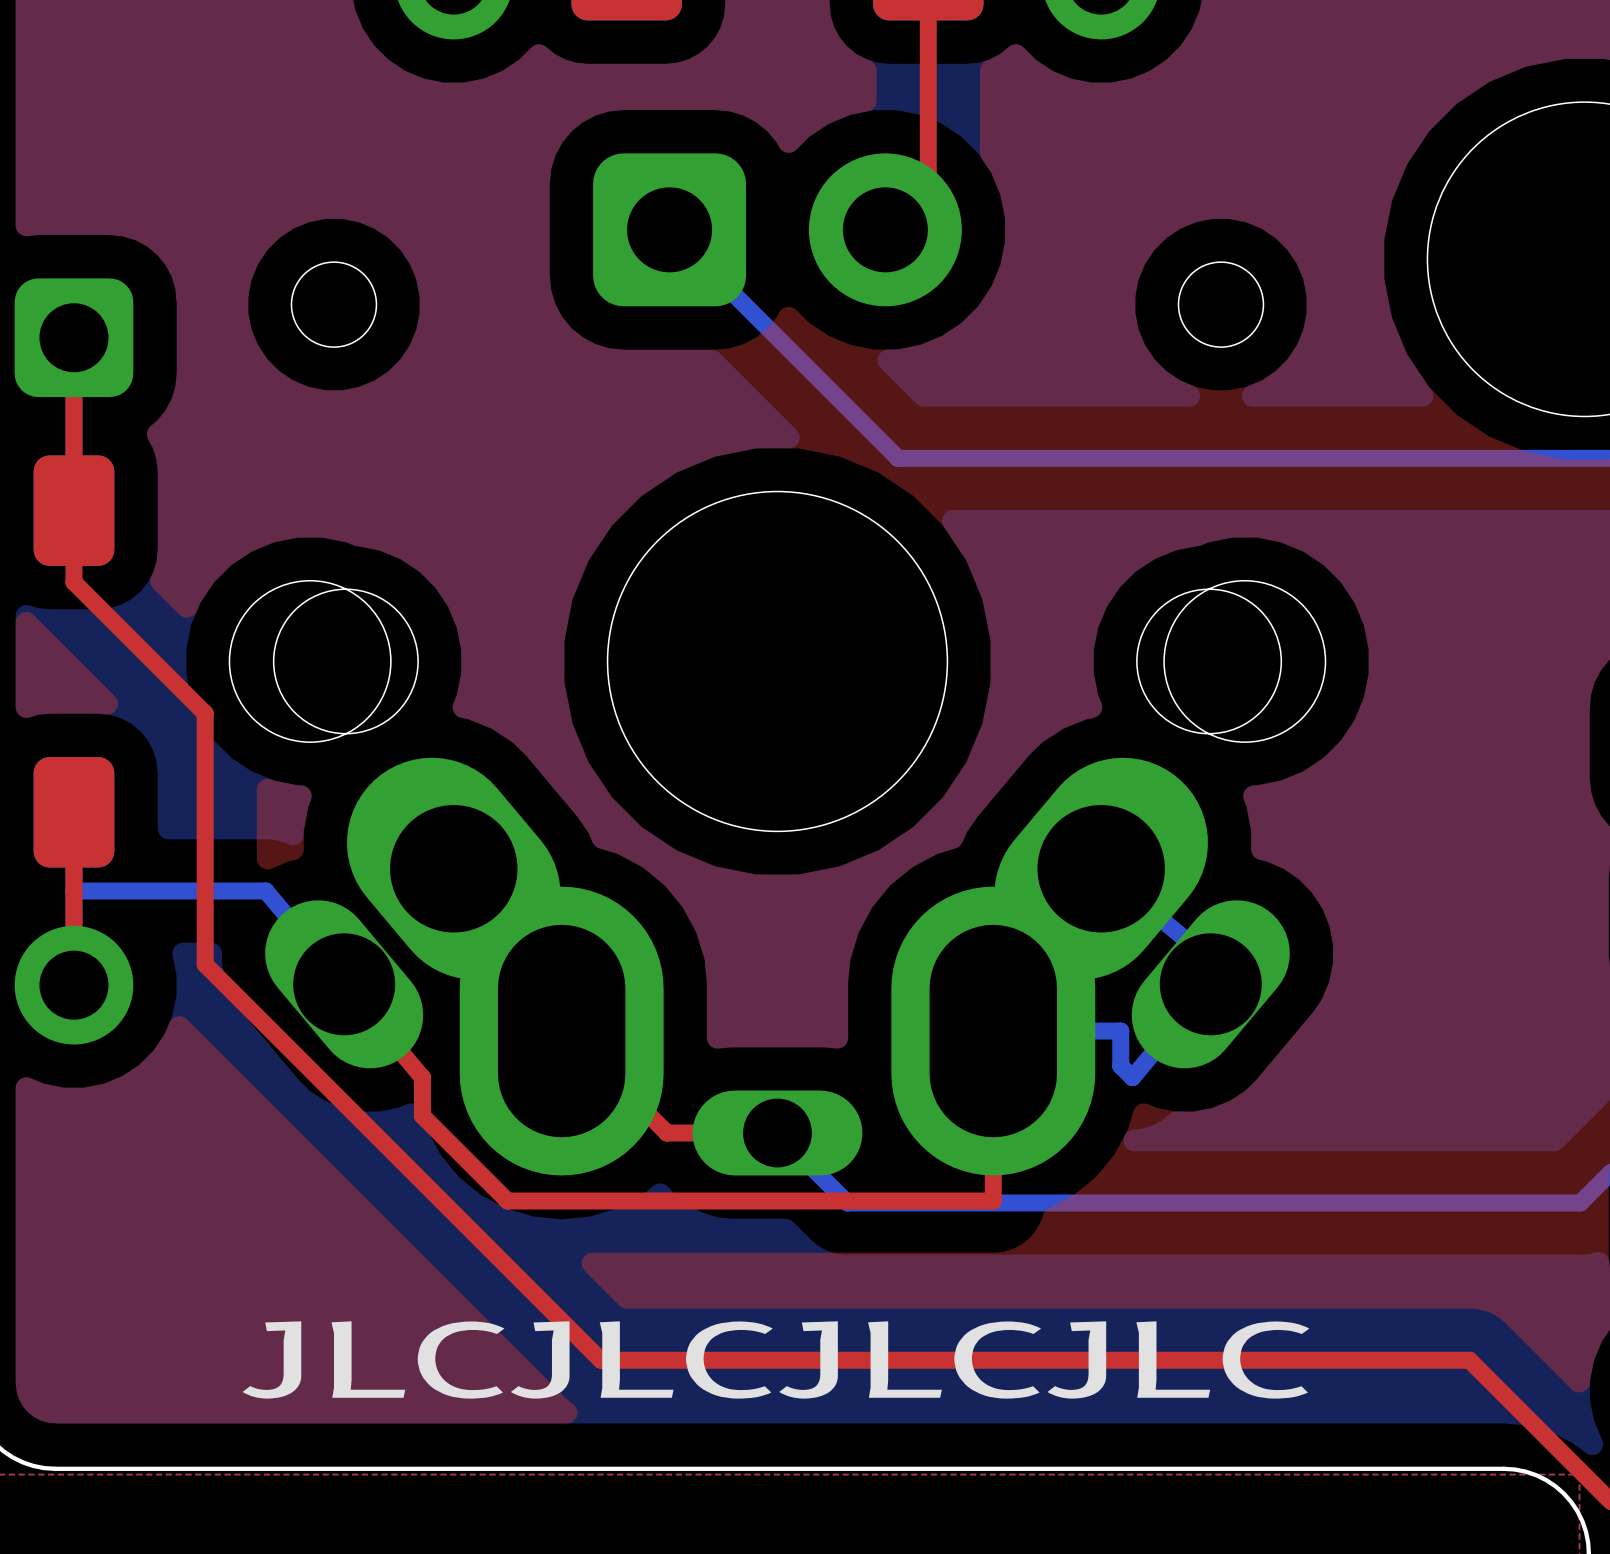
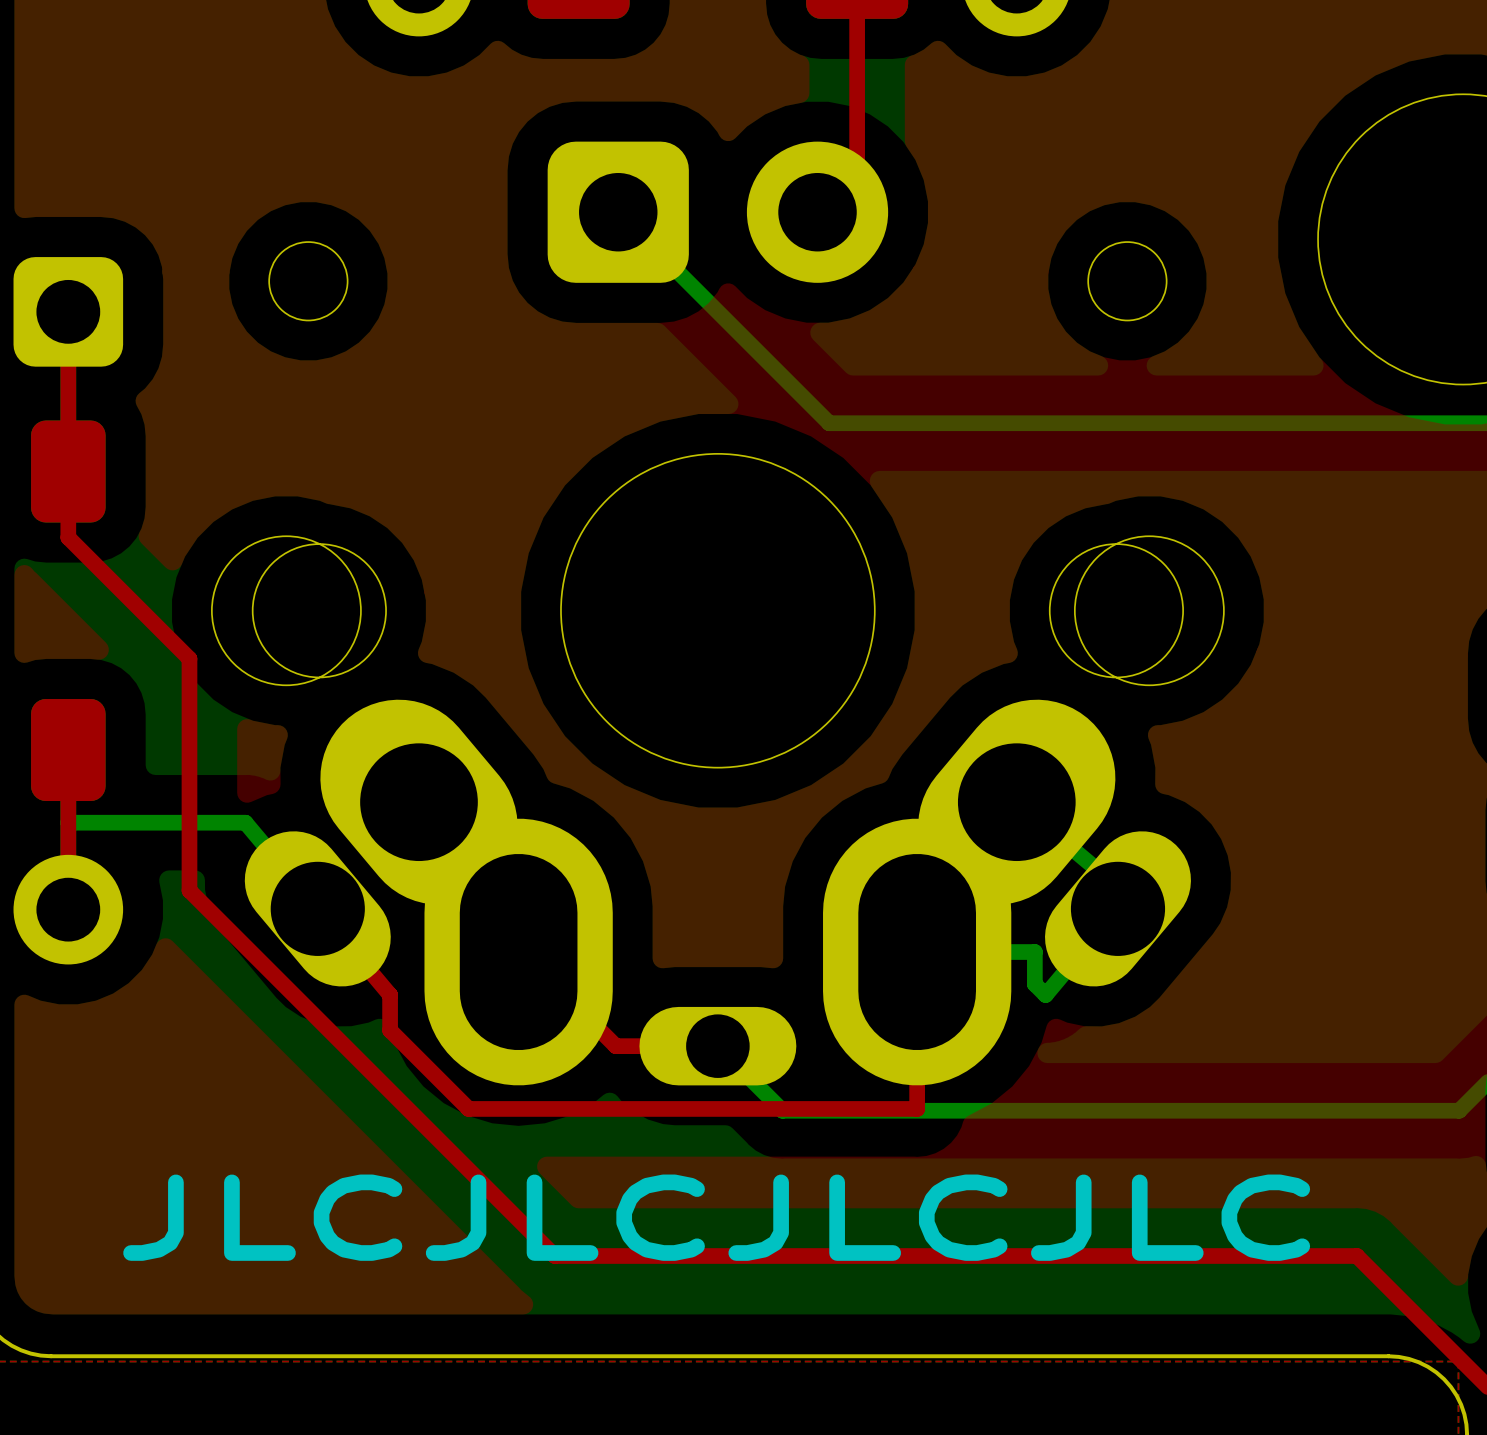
text position: JLCJLCJLCJLC (775, 1359) -> JLCJLCJLCJLC (716, 1217)

